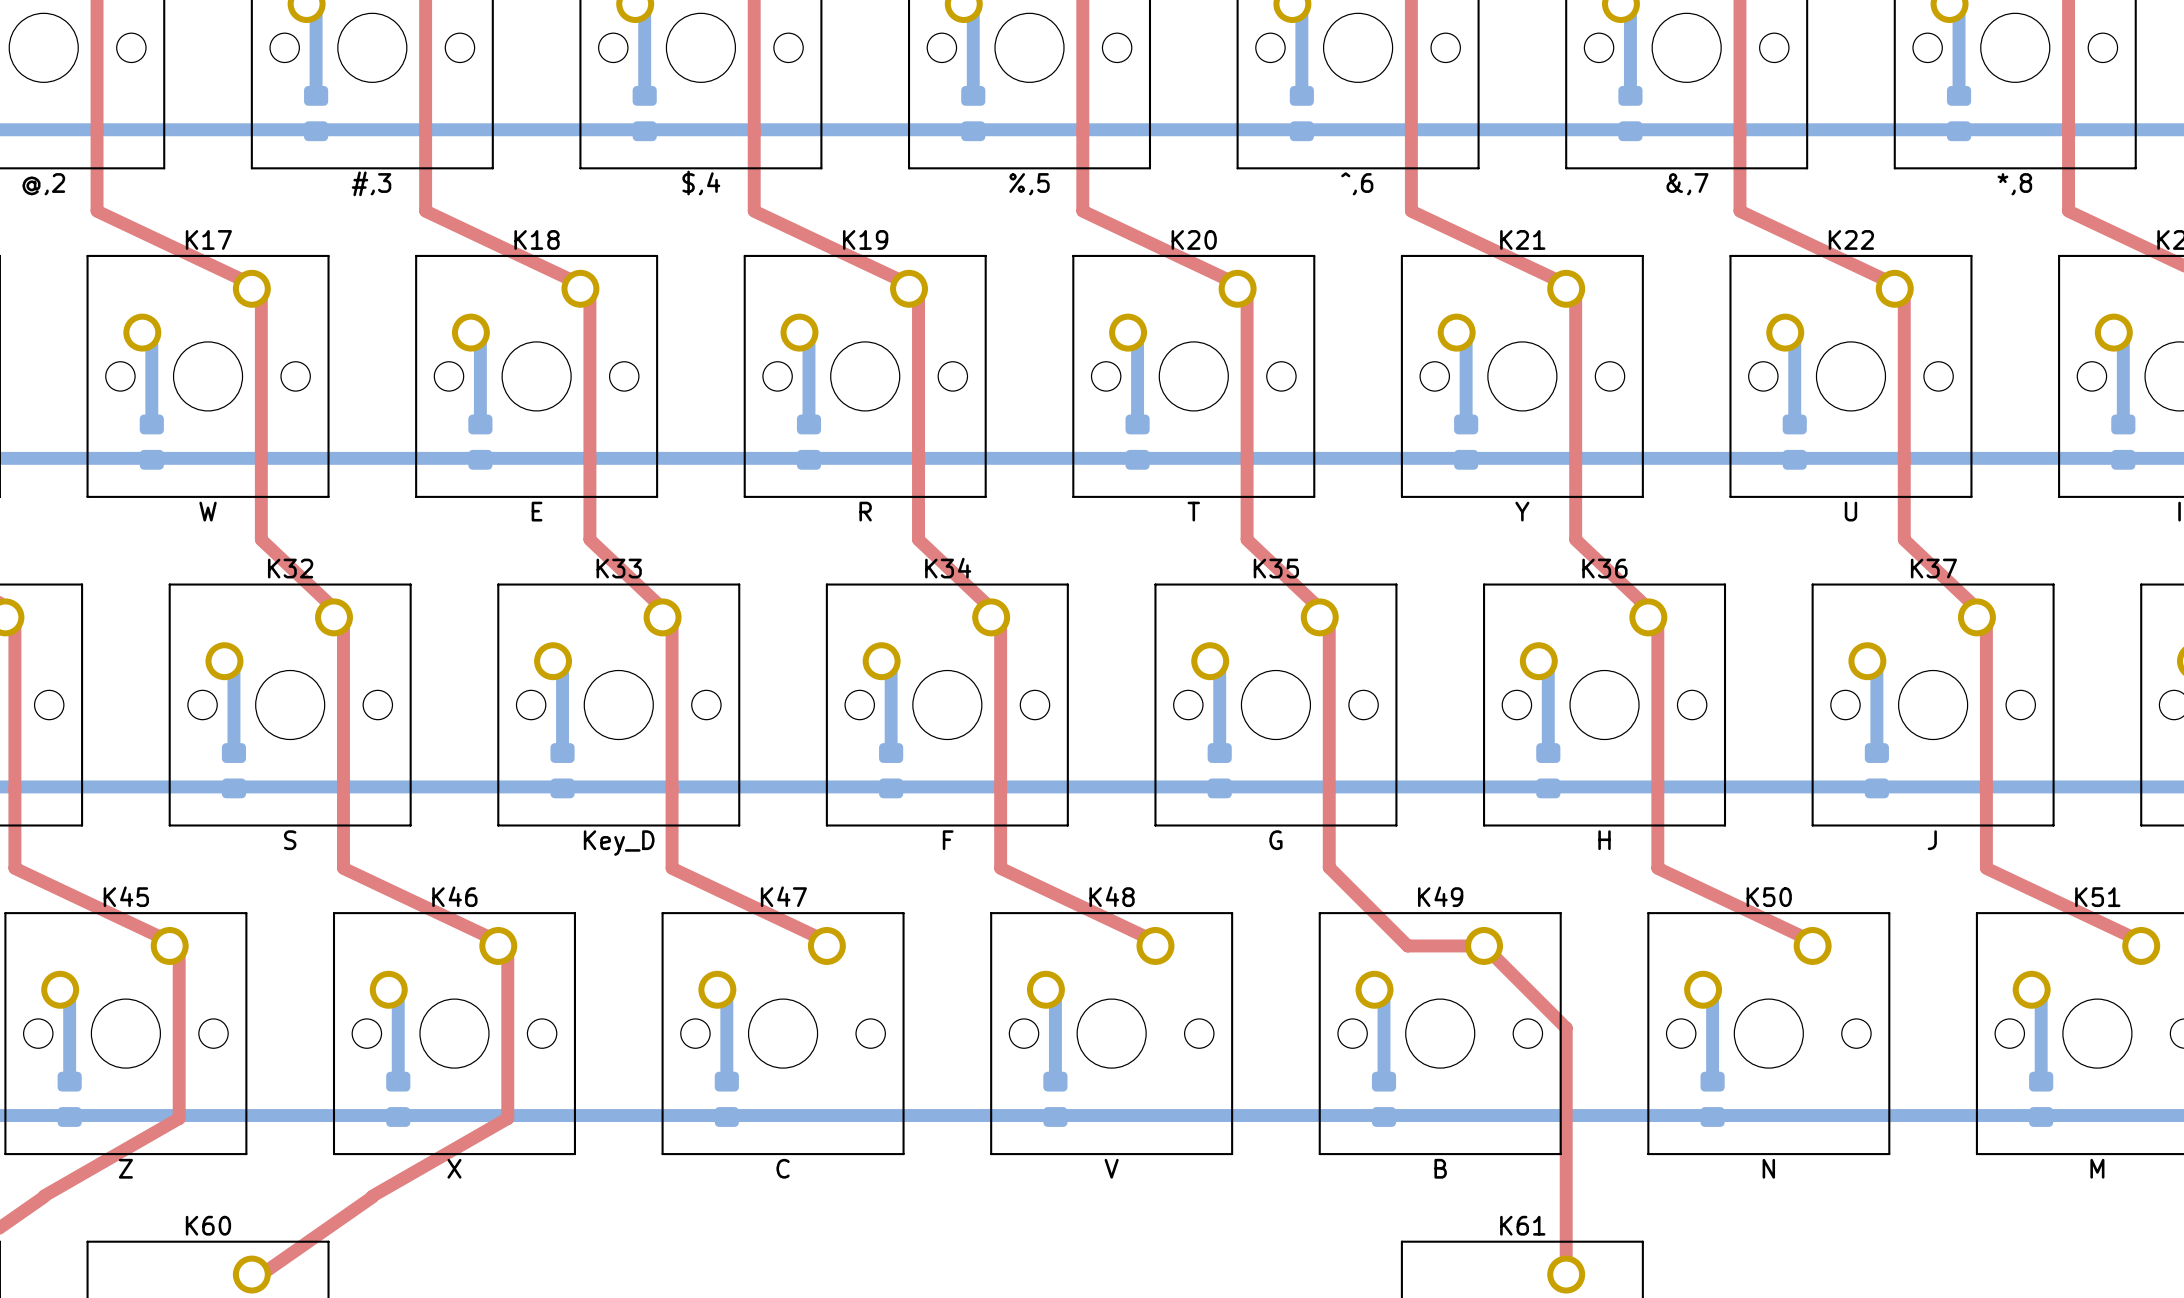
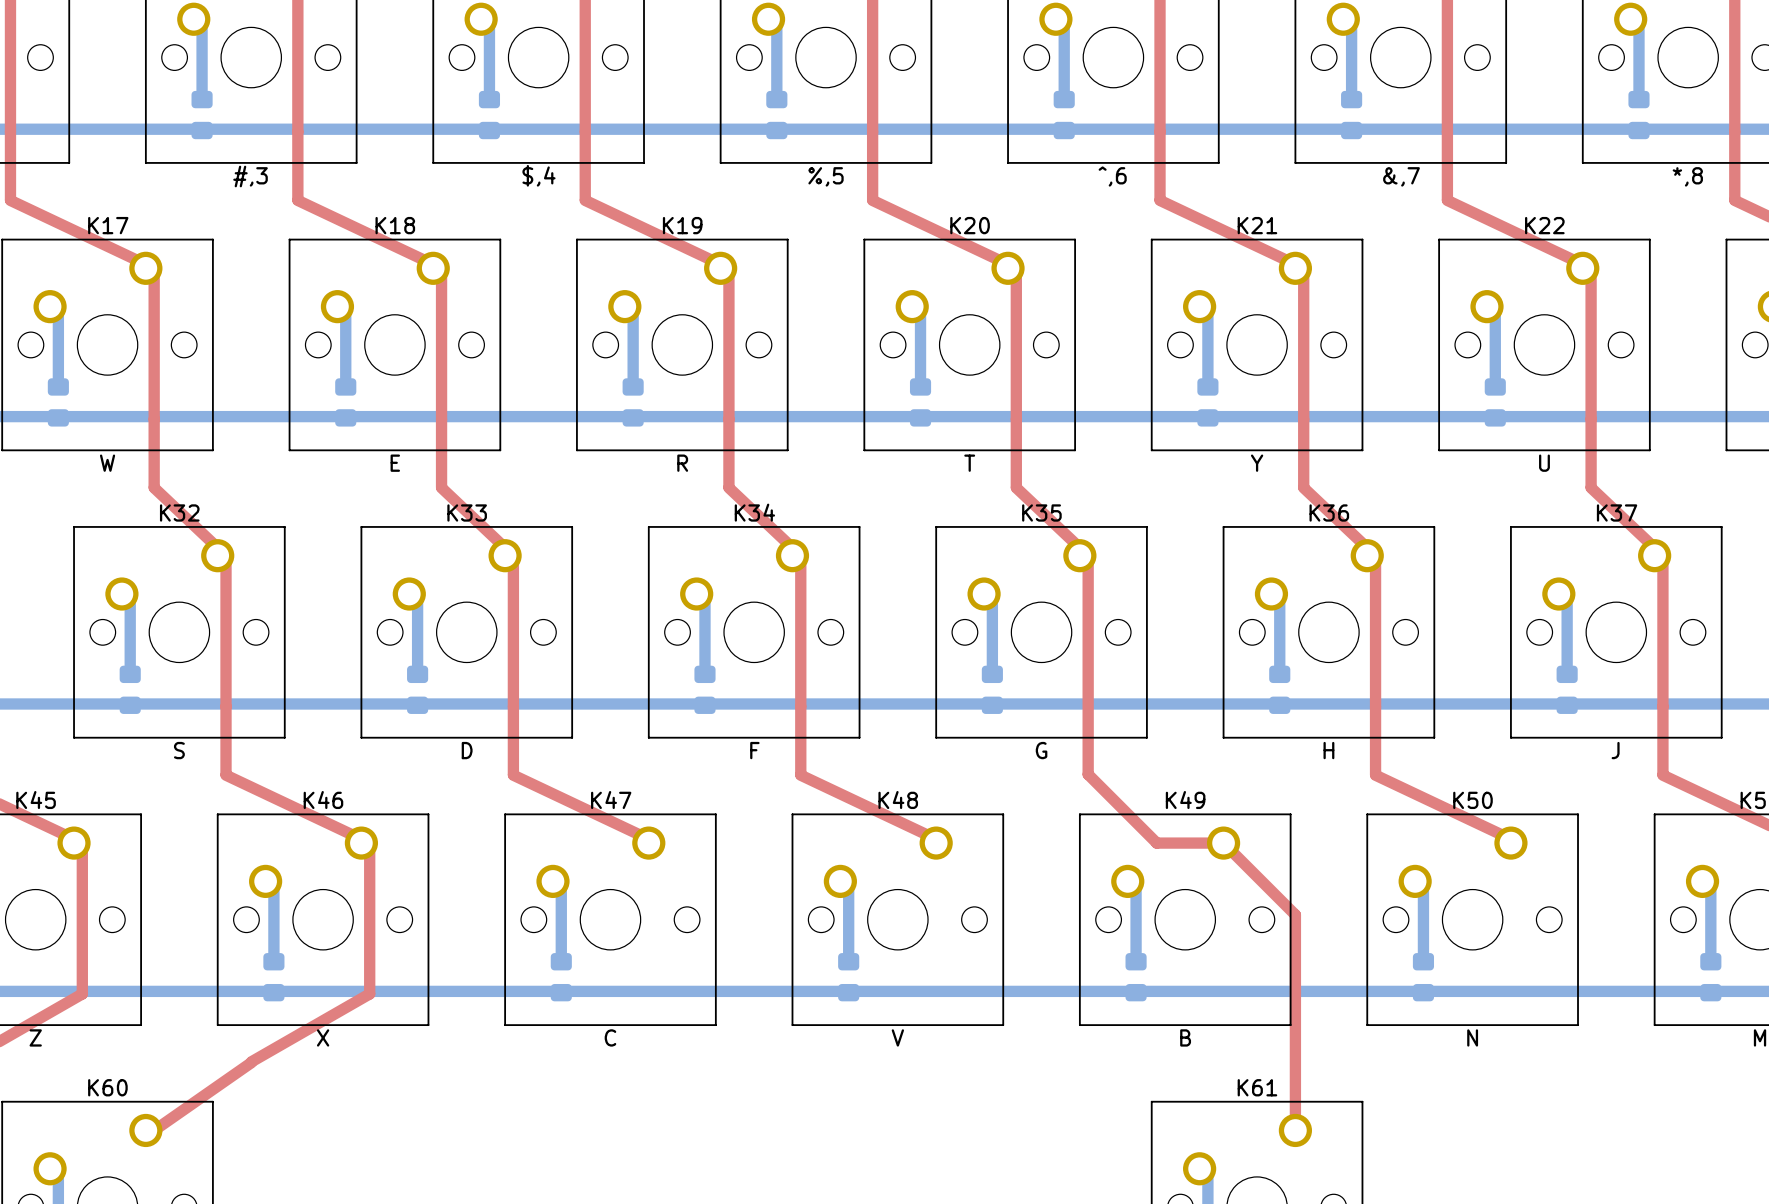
K33 value: Key_D (619, 843) -> D (467, 750)

